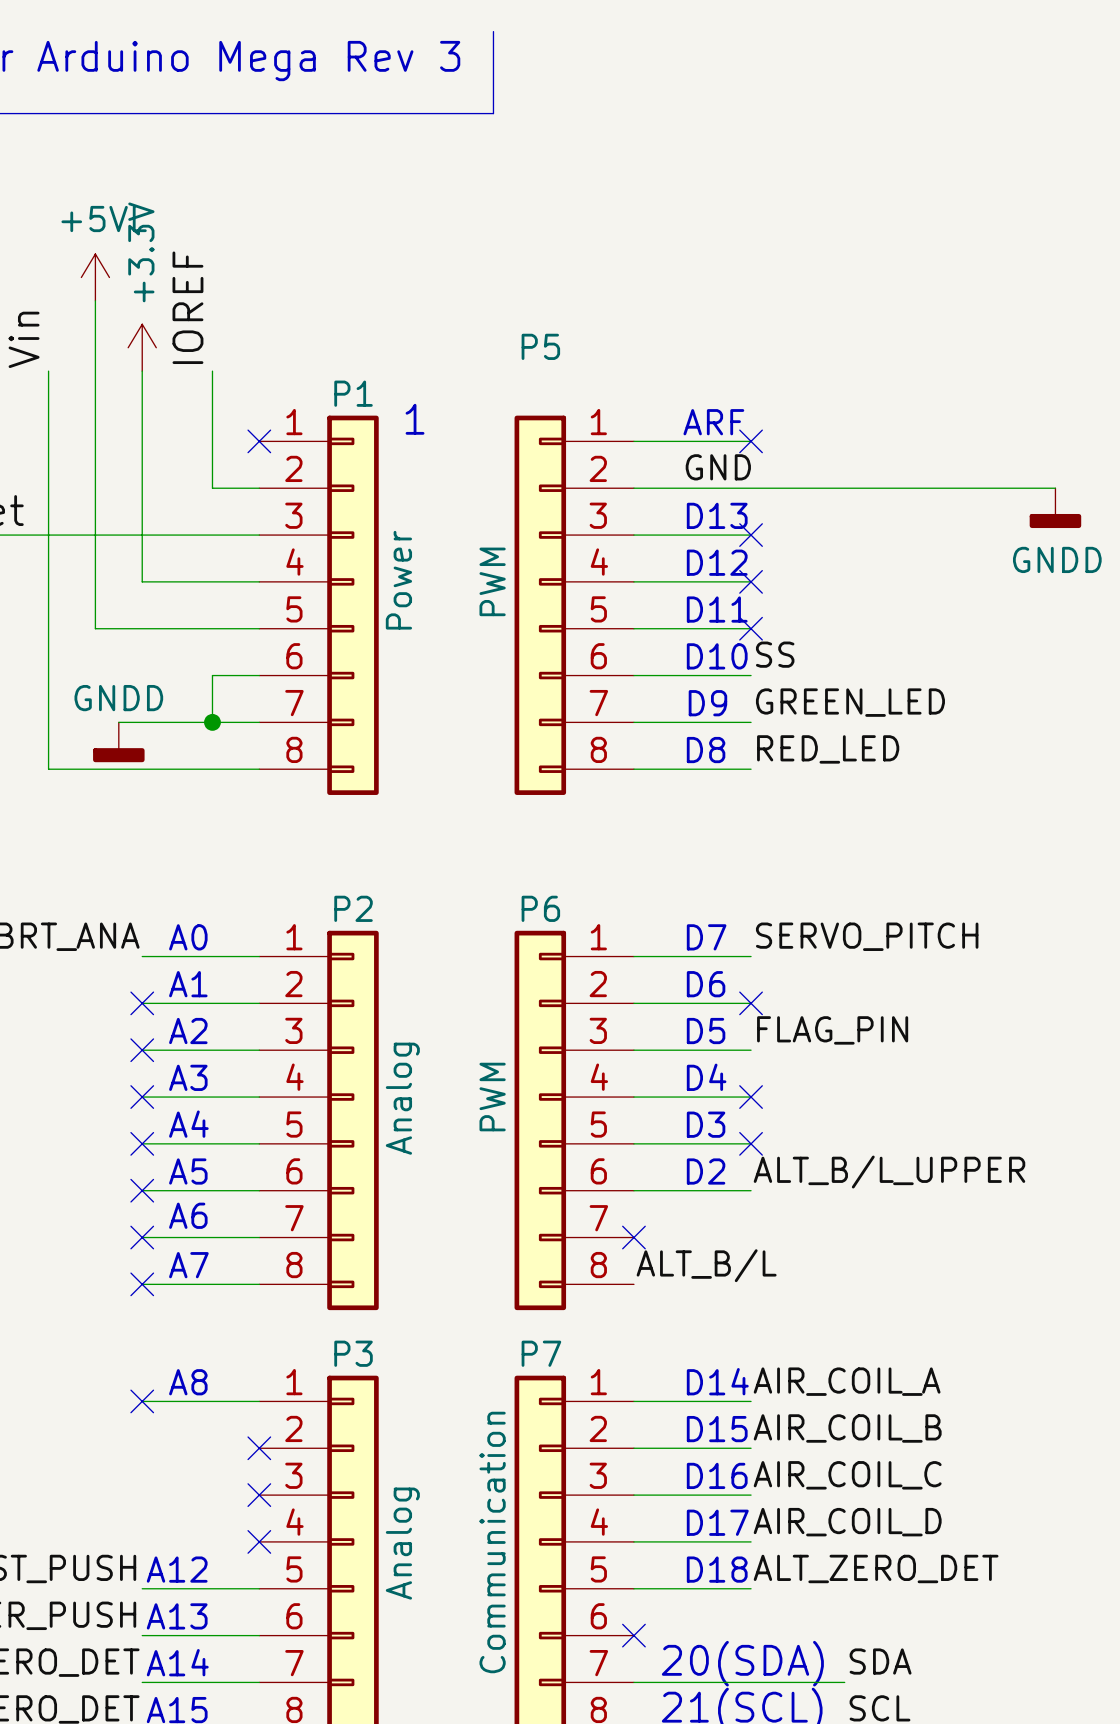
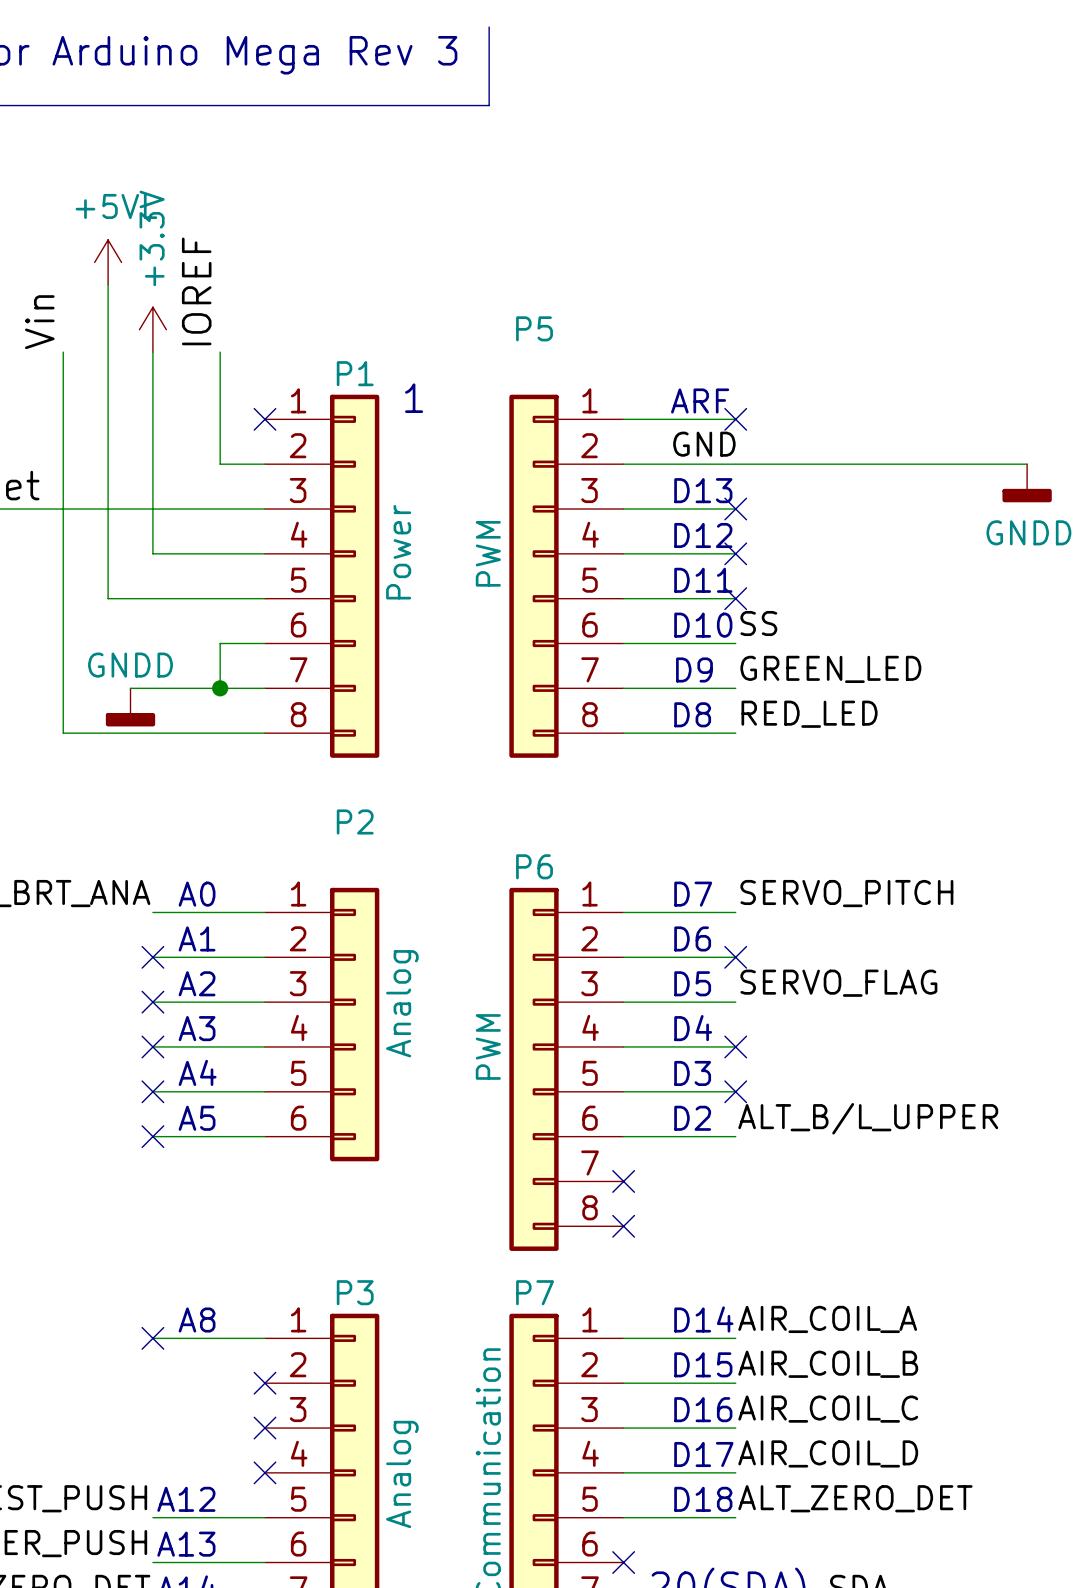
P2 symbol: [259, 930, 379, 1311] -> [265, 887, 380, 1162]
label: FLAG_PIN (832, 1030) -> SERVO_FLAG (838, 983)
text: A6 (188, 1215) -> none
wire: (142, 1237) (259, 1237) -> none
no-connect mark: (142, 1237) -> none
text: A7 (188, 1265) -> none
label: ALT_B/L (706, 1265) -> none
wire: (142, 1284) (259, 1284) -> none
no-connect mark: (142, 1284) -> none
no-connect mark: none -> (623, 1226)

